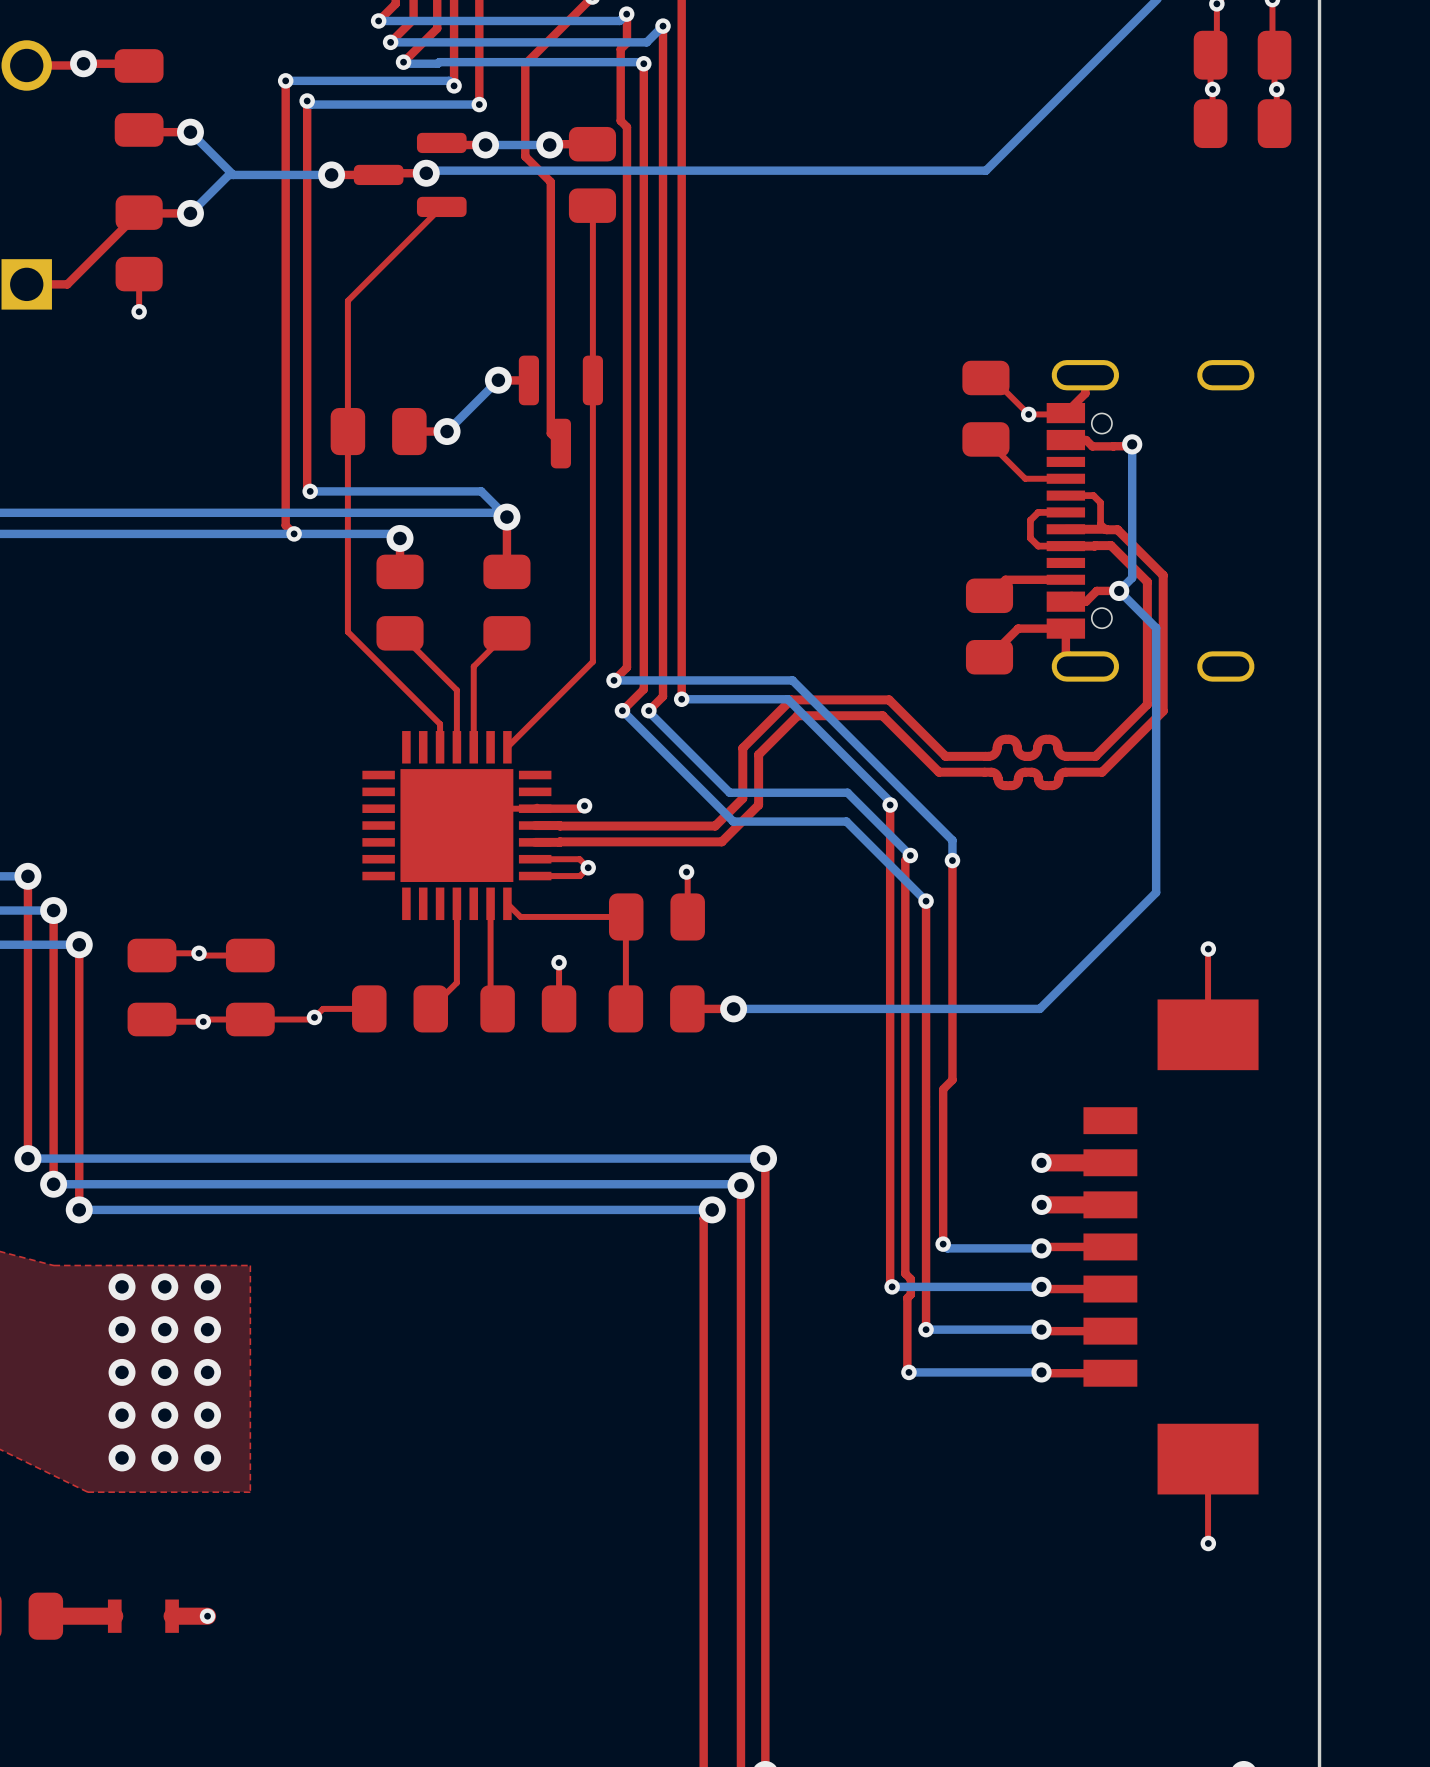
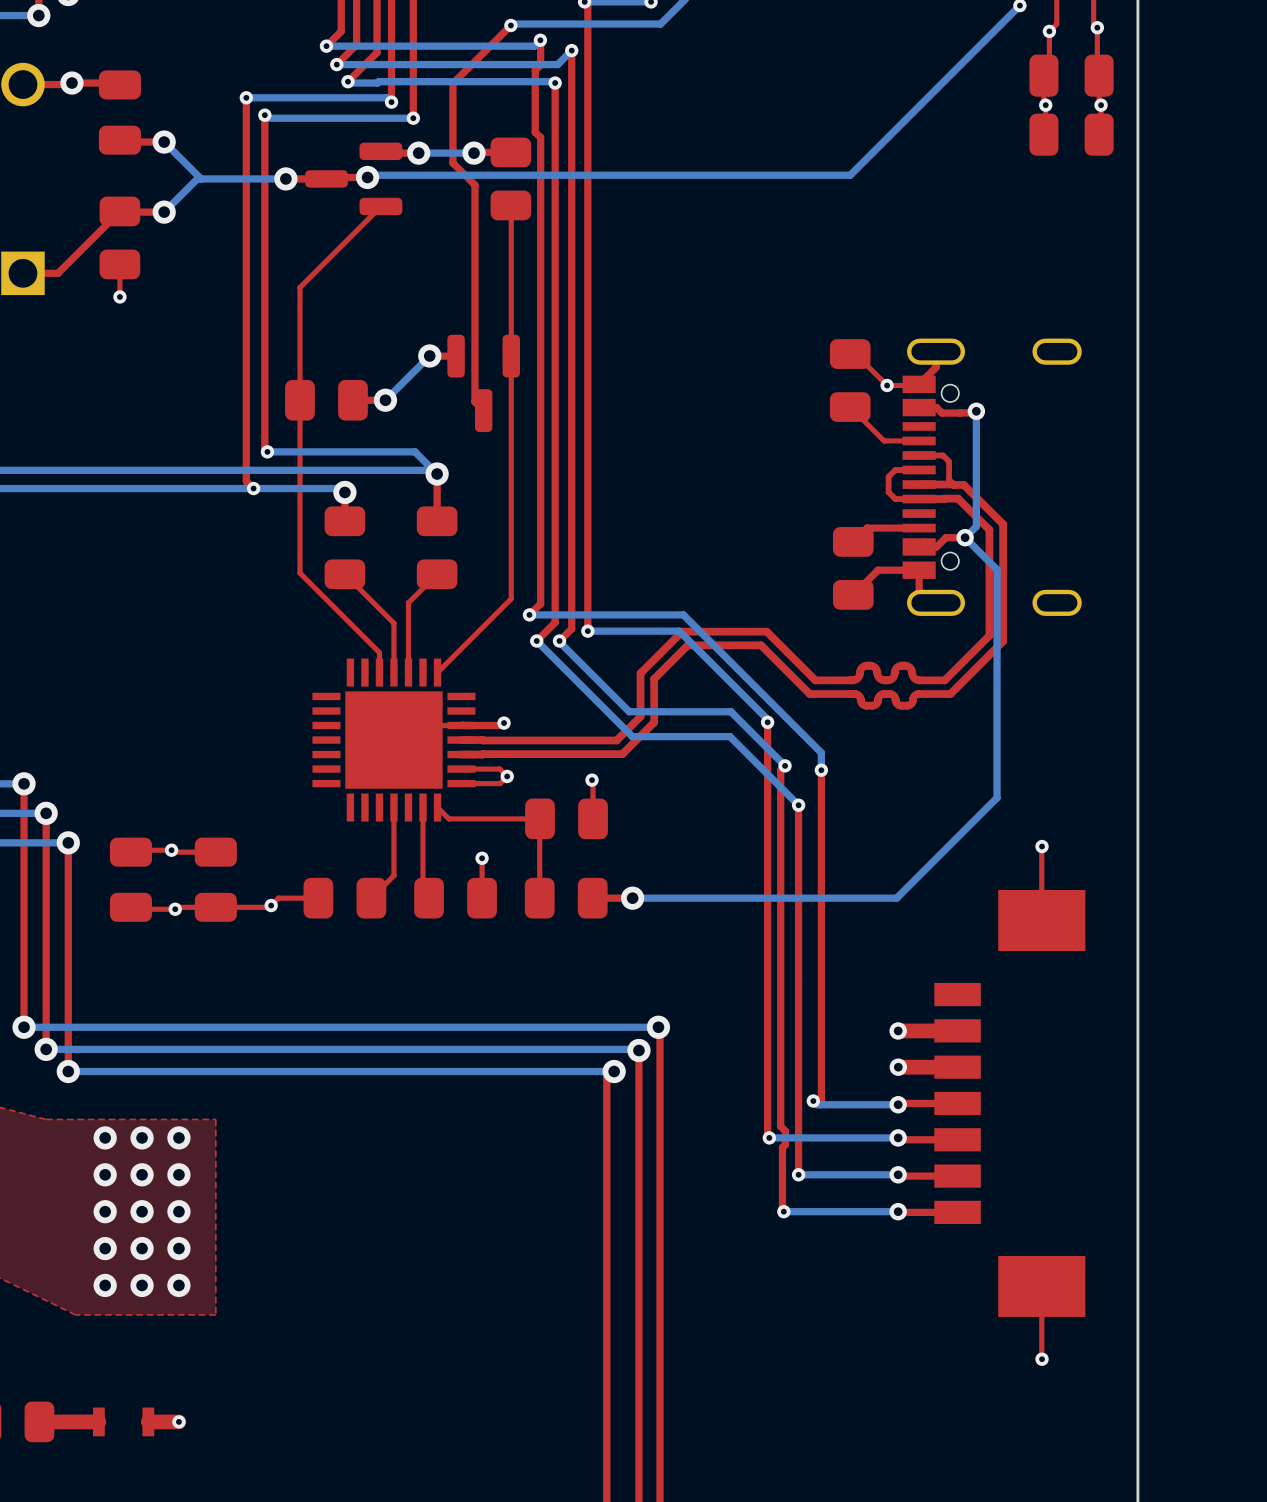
top track: (952, 1080) (943, 1089) -> (821, 959) (820, 1104)
top track: (943, 1090) (943, 1244) -> none

